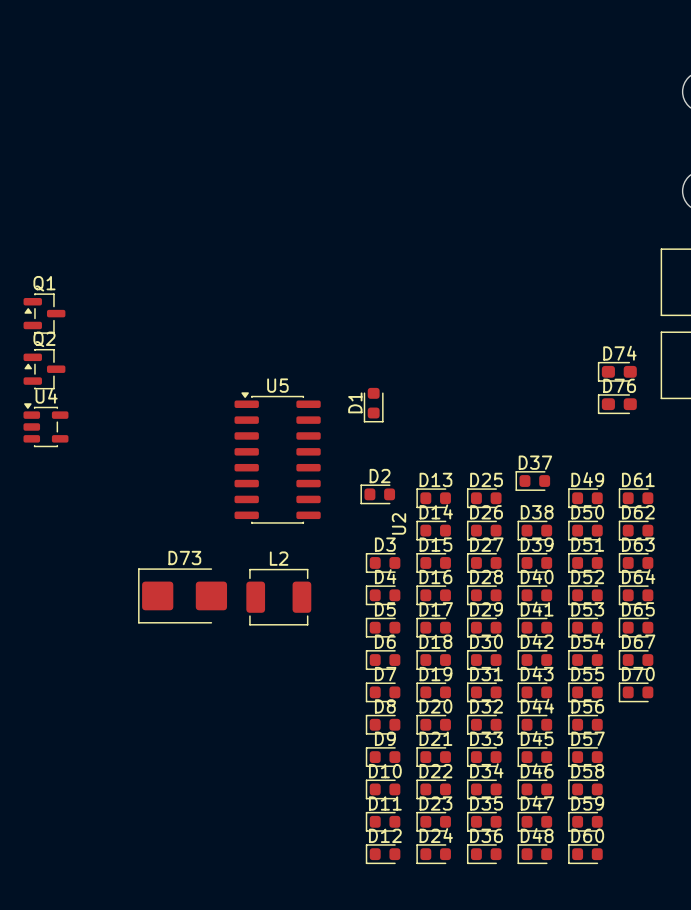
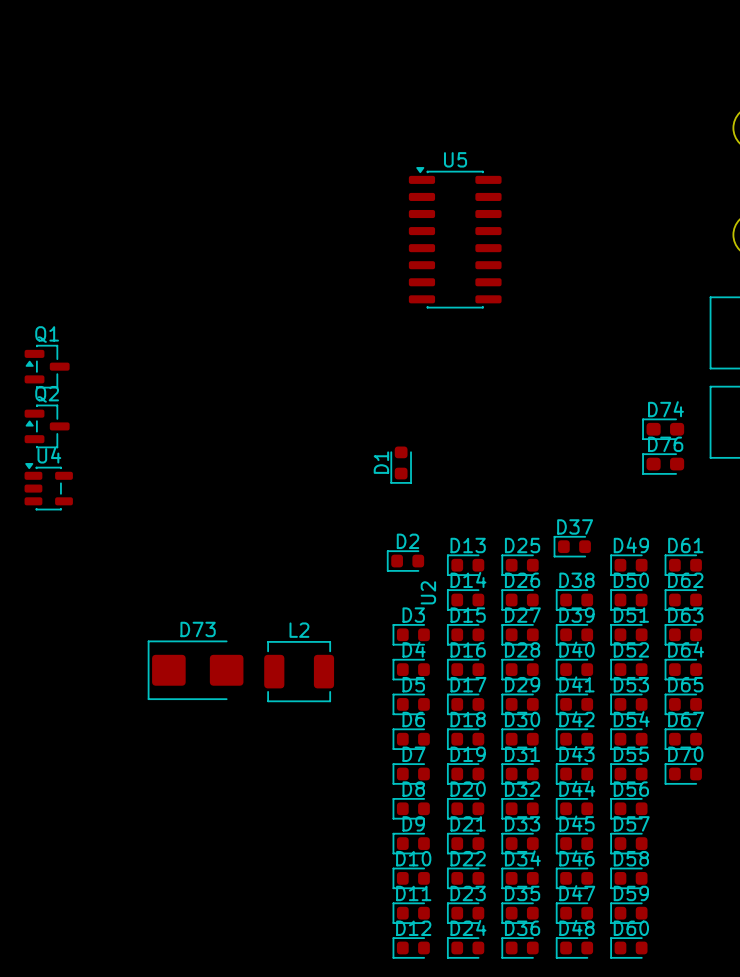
U5 position: (277, 458) -> (455, 237)

